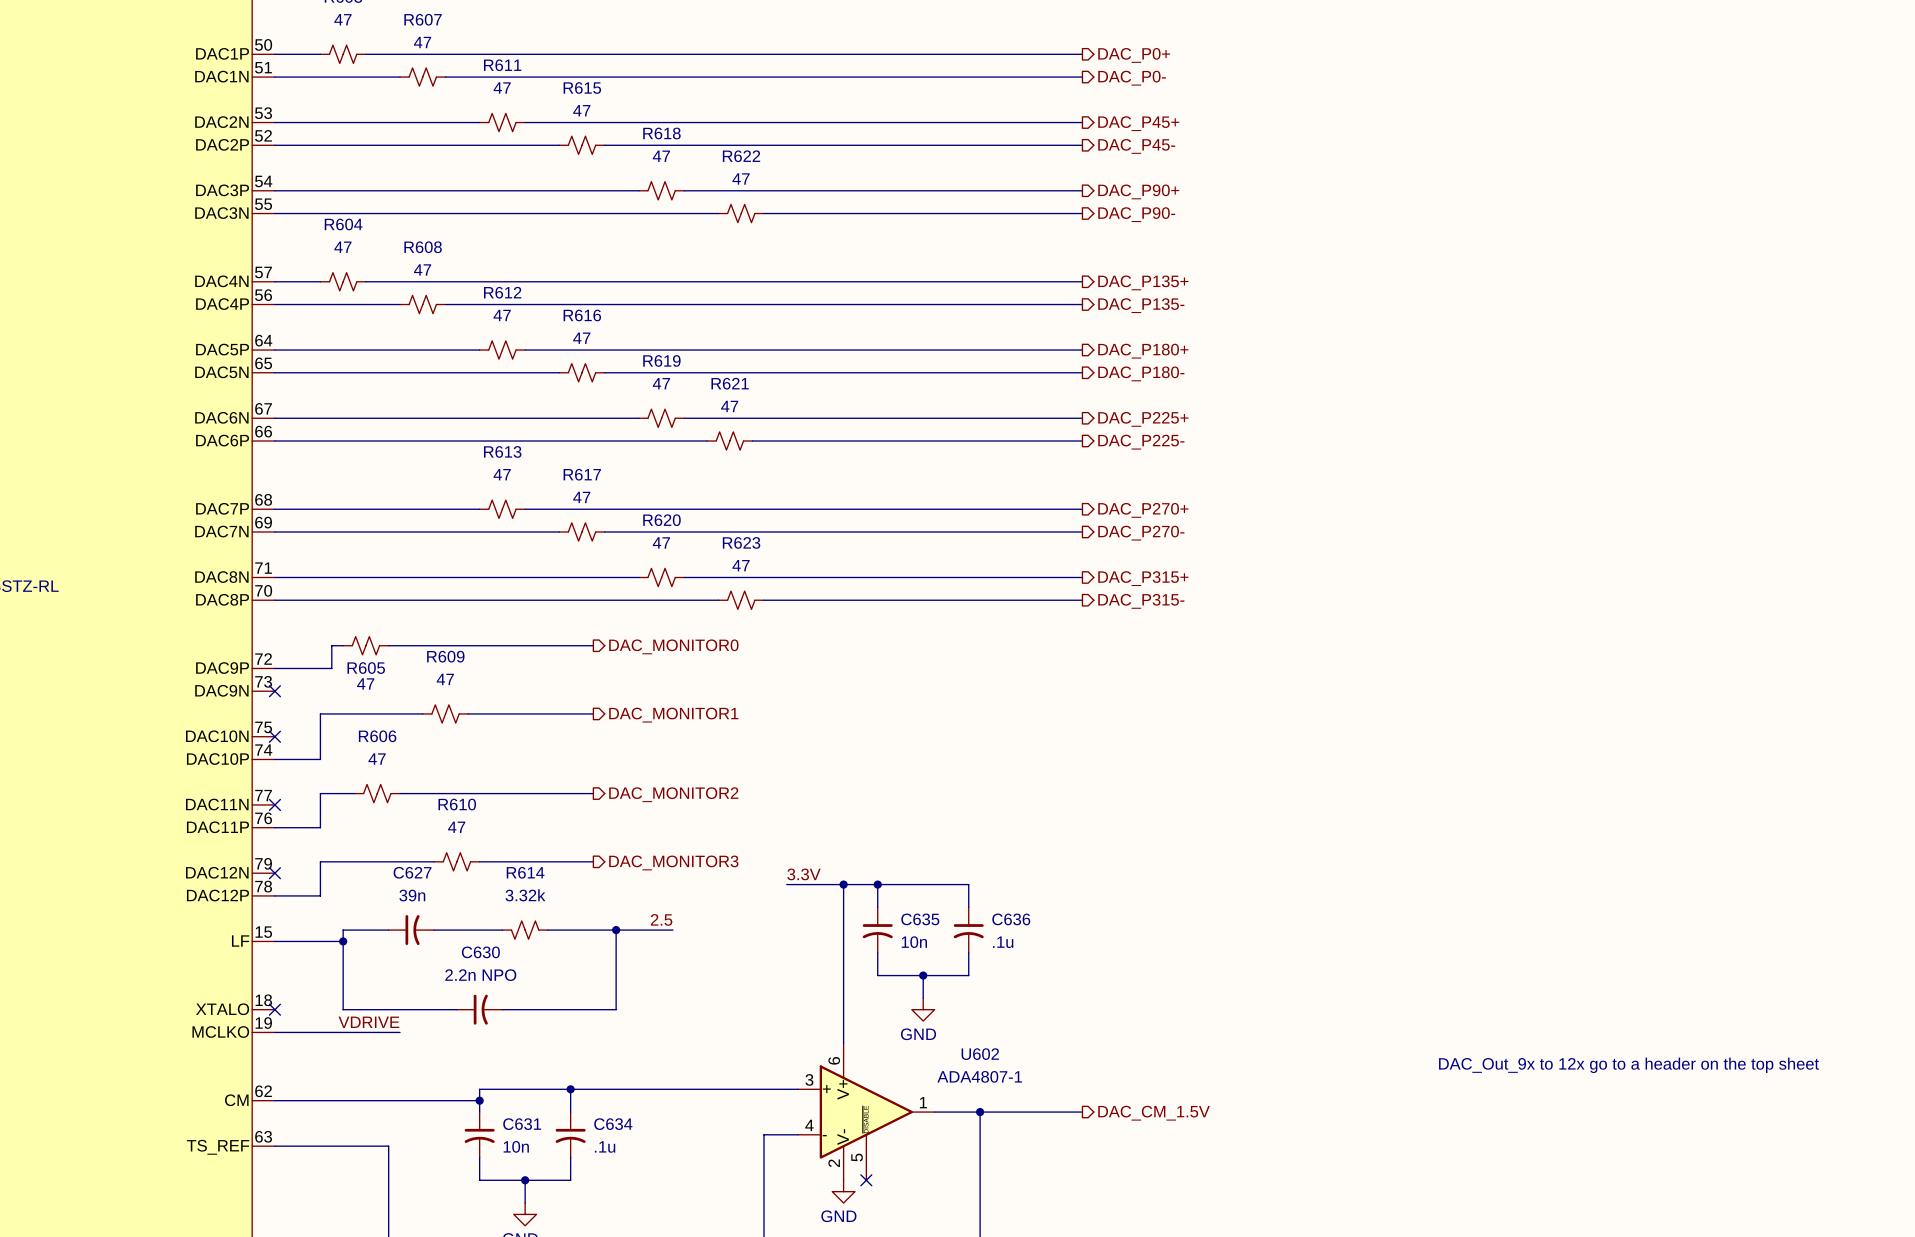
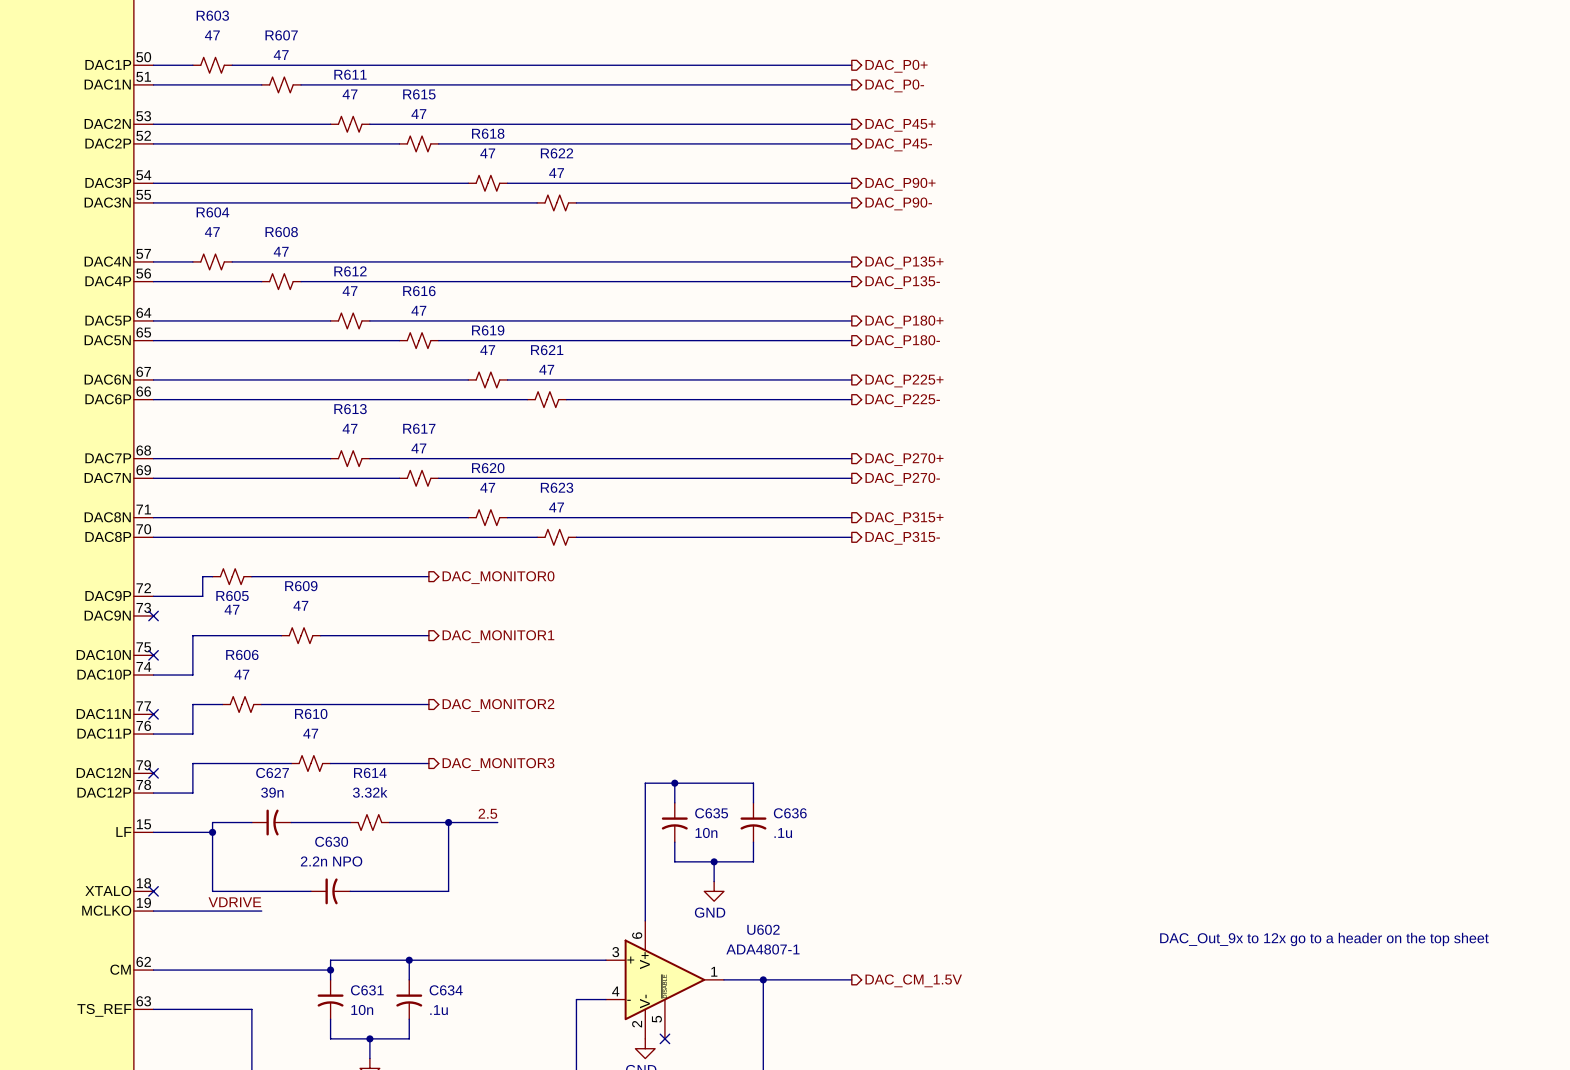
label: 3.3V (804, 874) -> none
wire: (786, 884) (843, 884) -> none
junction: (843, 884) -> none

